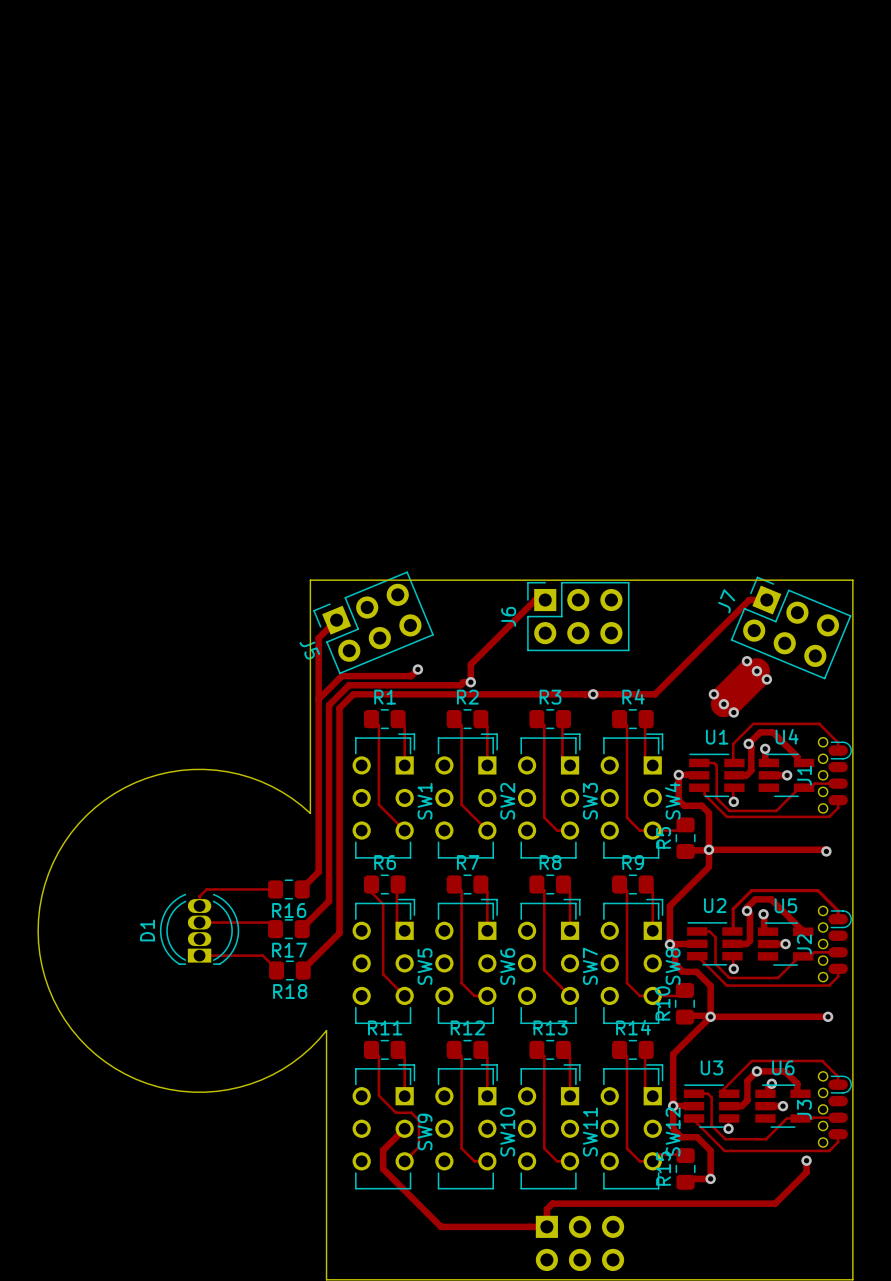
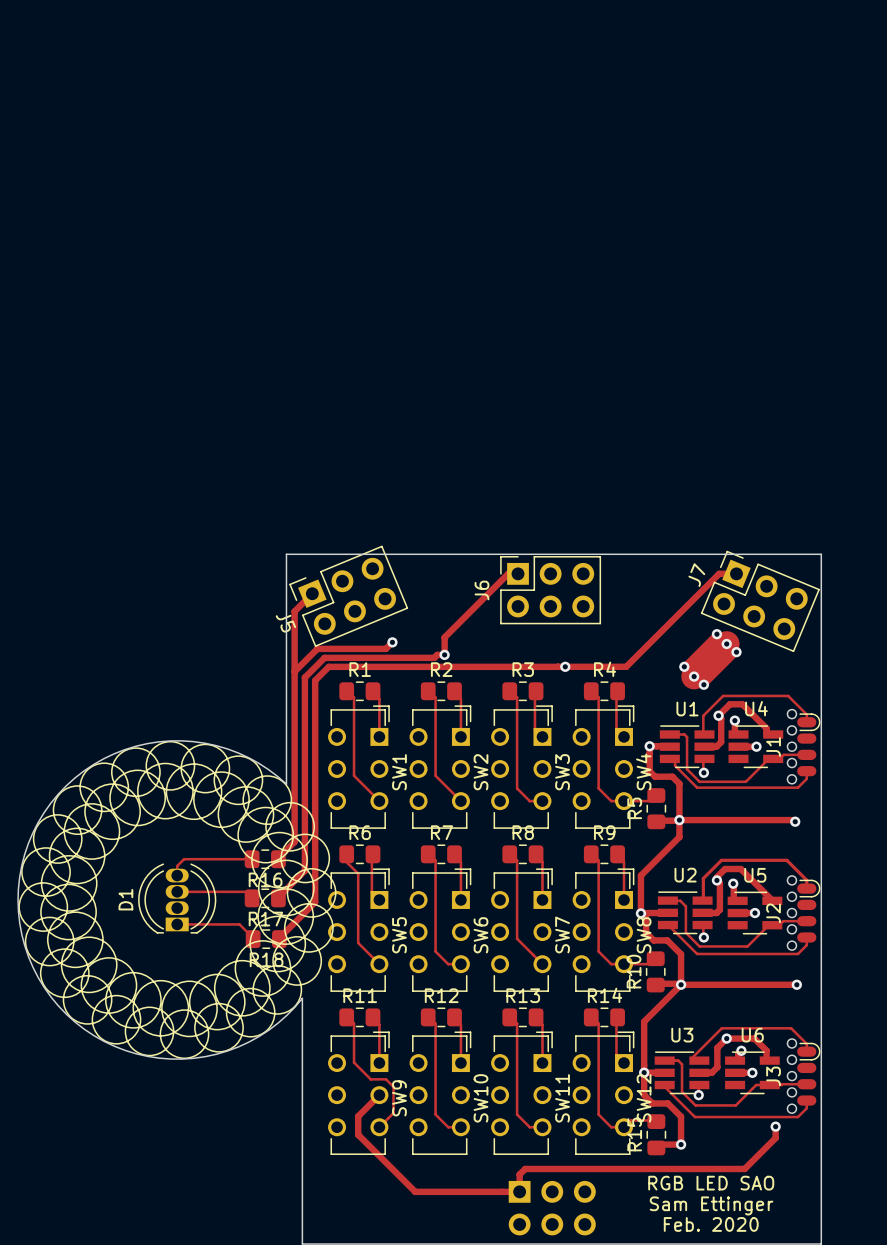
drawing: none -> [18, 740, 337, 1060]
text: none -> RGB LED SAO (711, 1183)
text: none -> Sam Ettinger (711, 1205)
text: none -> Feb. 2020 (711, 1224)

